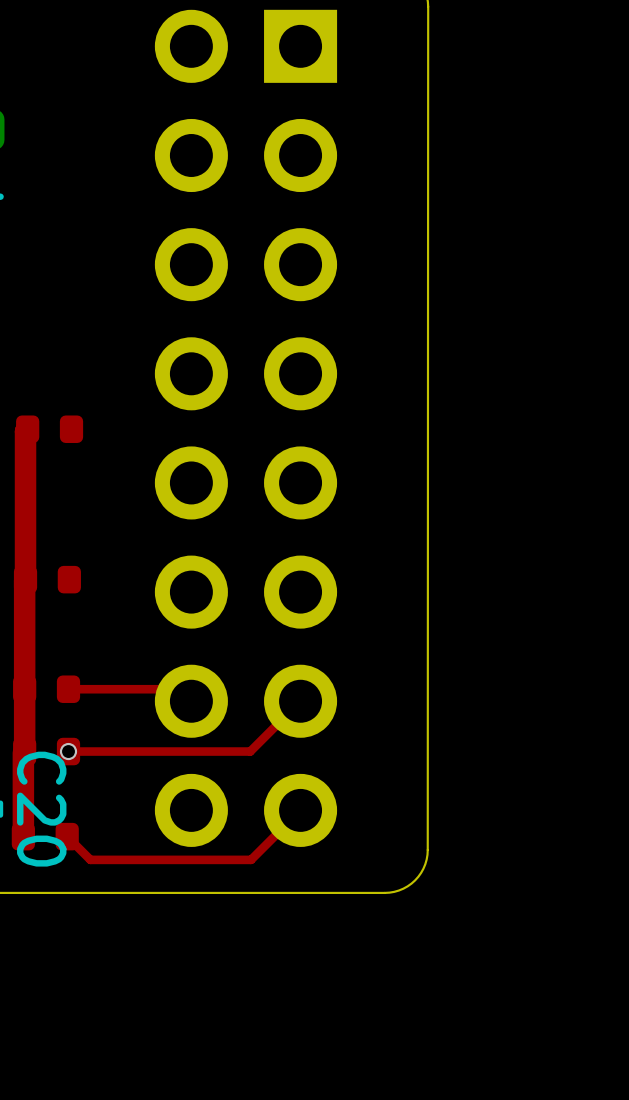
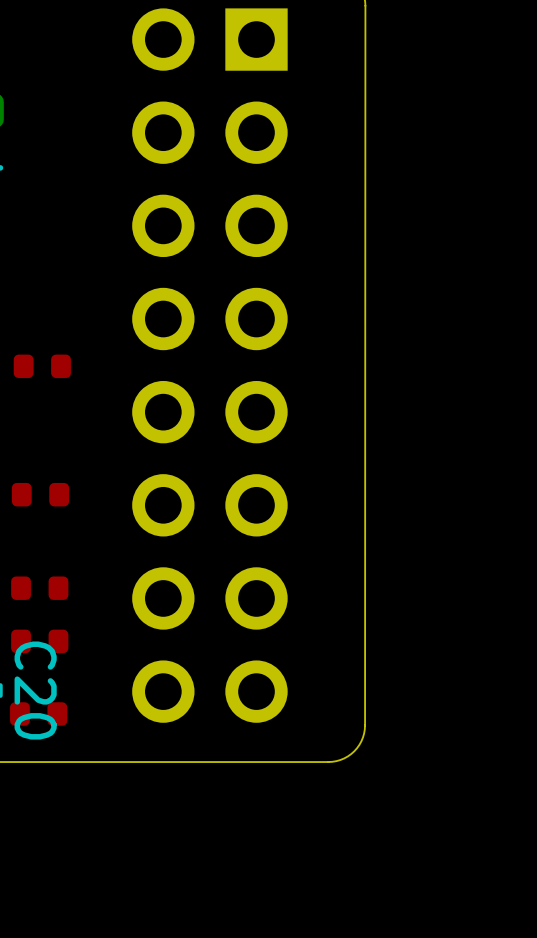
top track: (27, 429) (25, 431) (23, 836) -> none
top track: (68, 689) (179, 689) (191, 701) -> none
top track: (300, 701) (250, 751) (68, 751) -> none
via: (68, 751) -> none
top track: (300, 810) (251, 859) (90, 859) (67, 836) -> none

